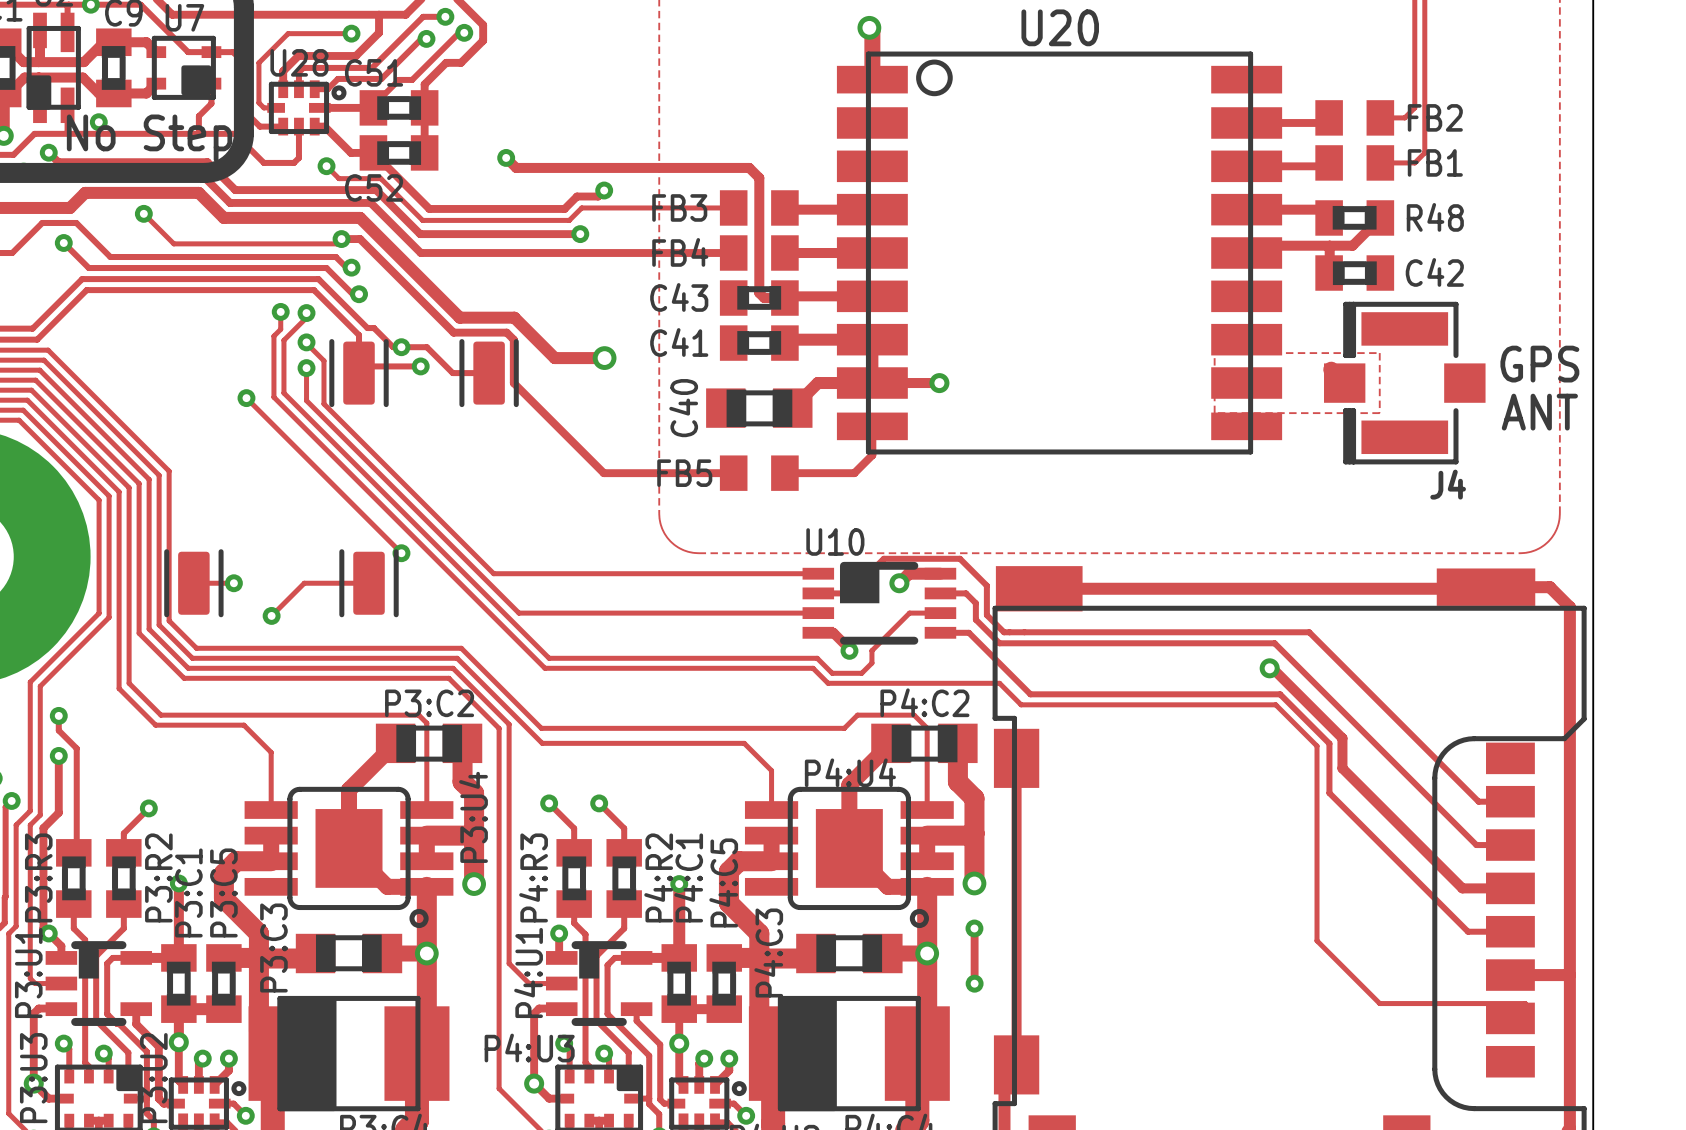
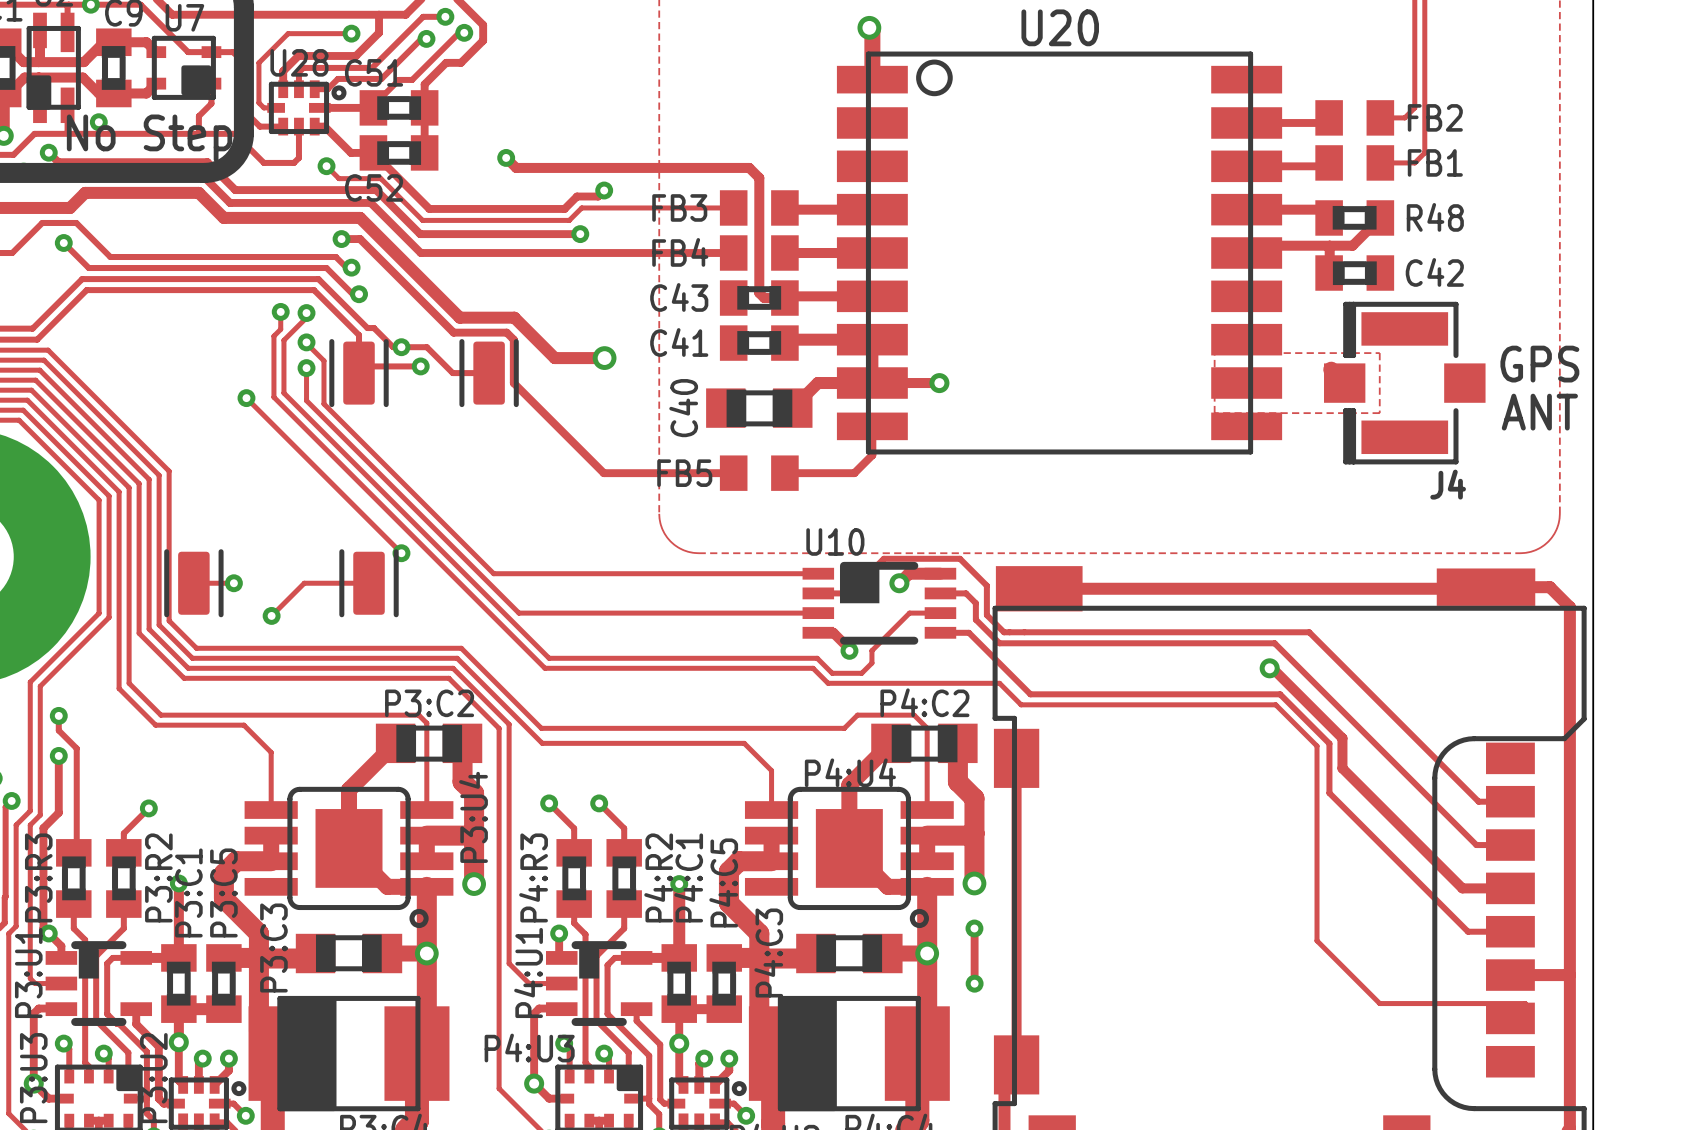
track: (143, 213) (173, 243) (336, 243) (341, 239) -> none
via: (143, 213) -> none

